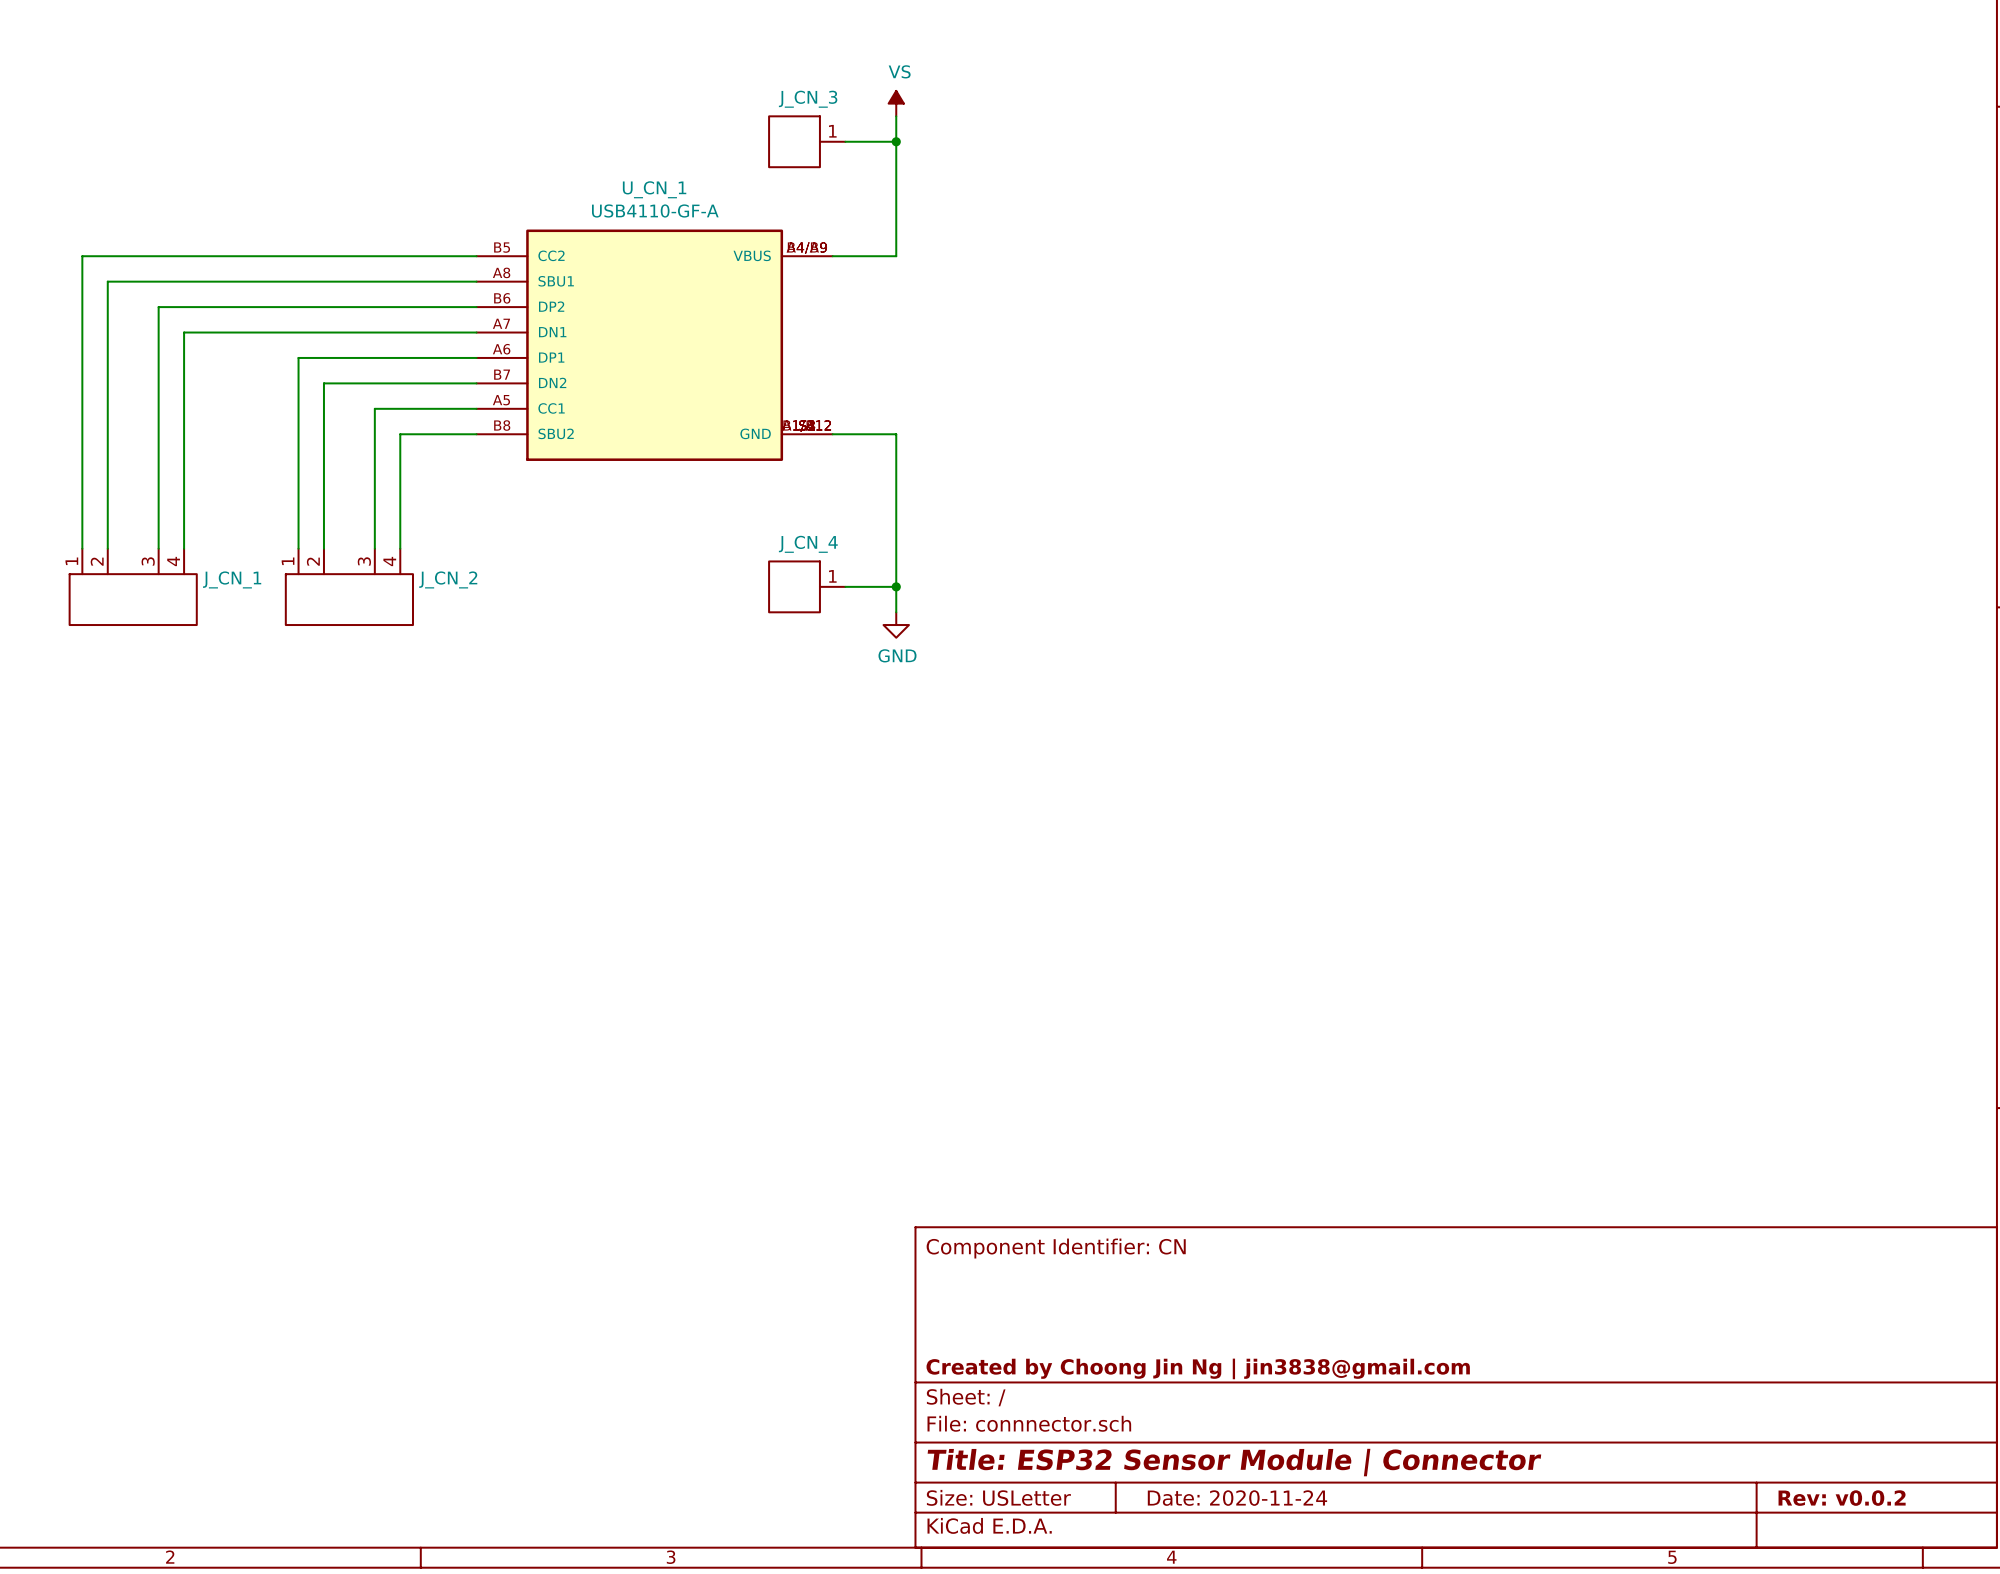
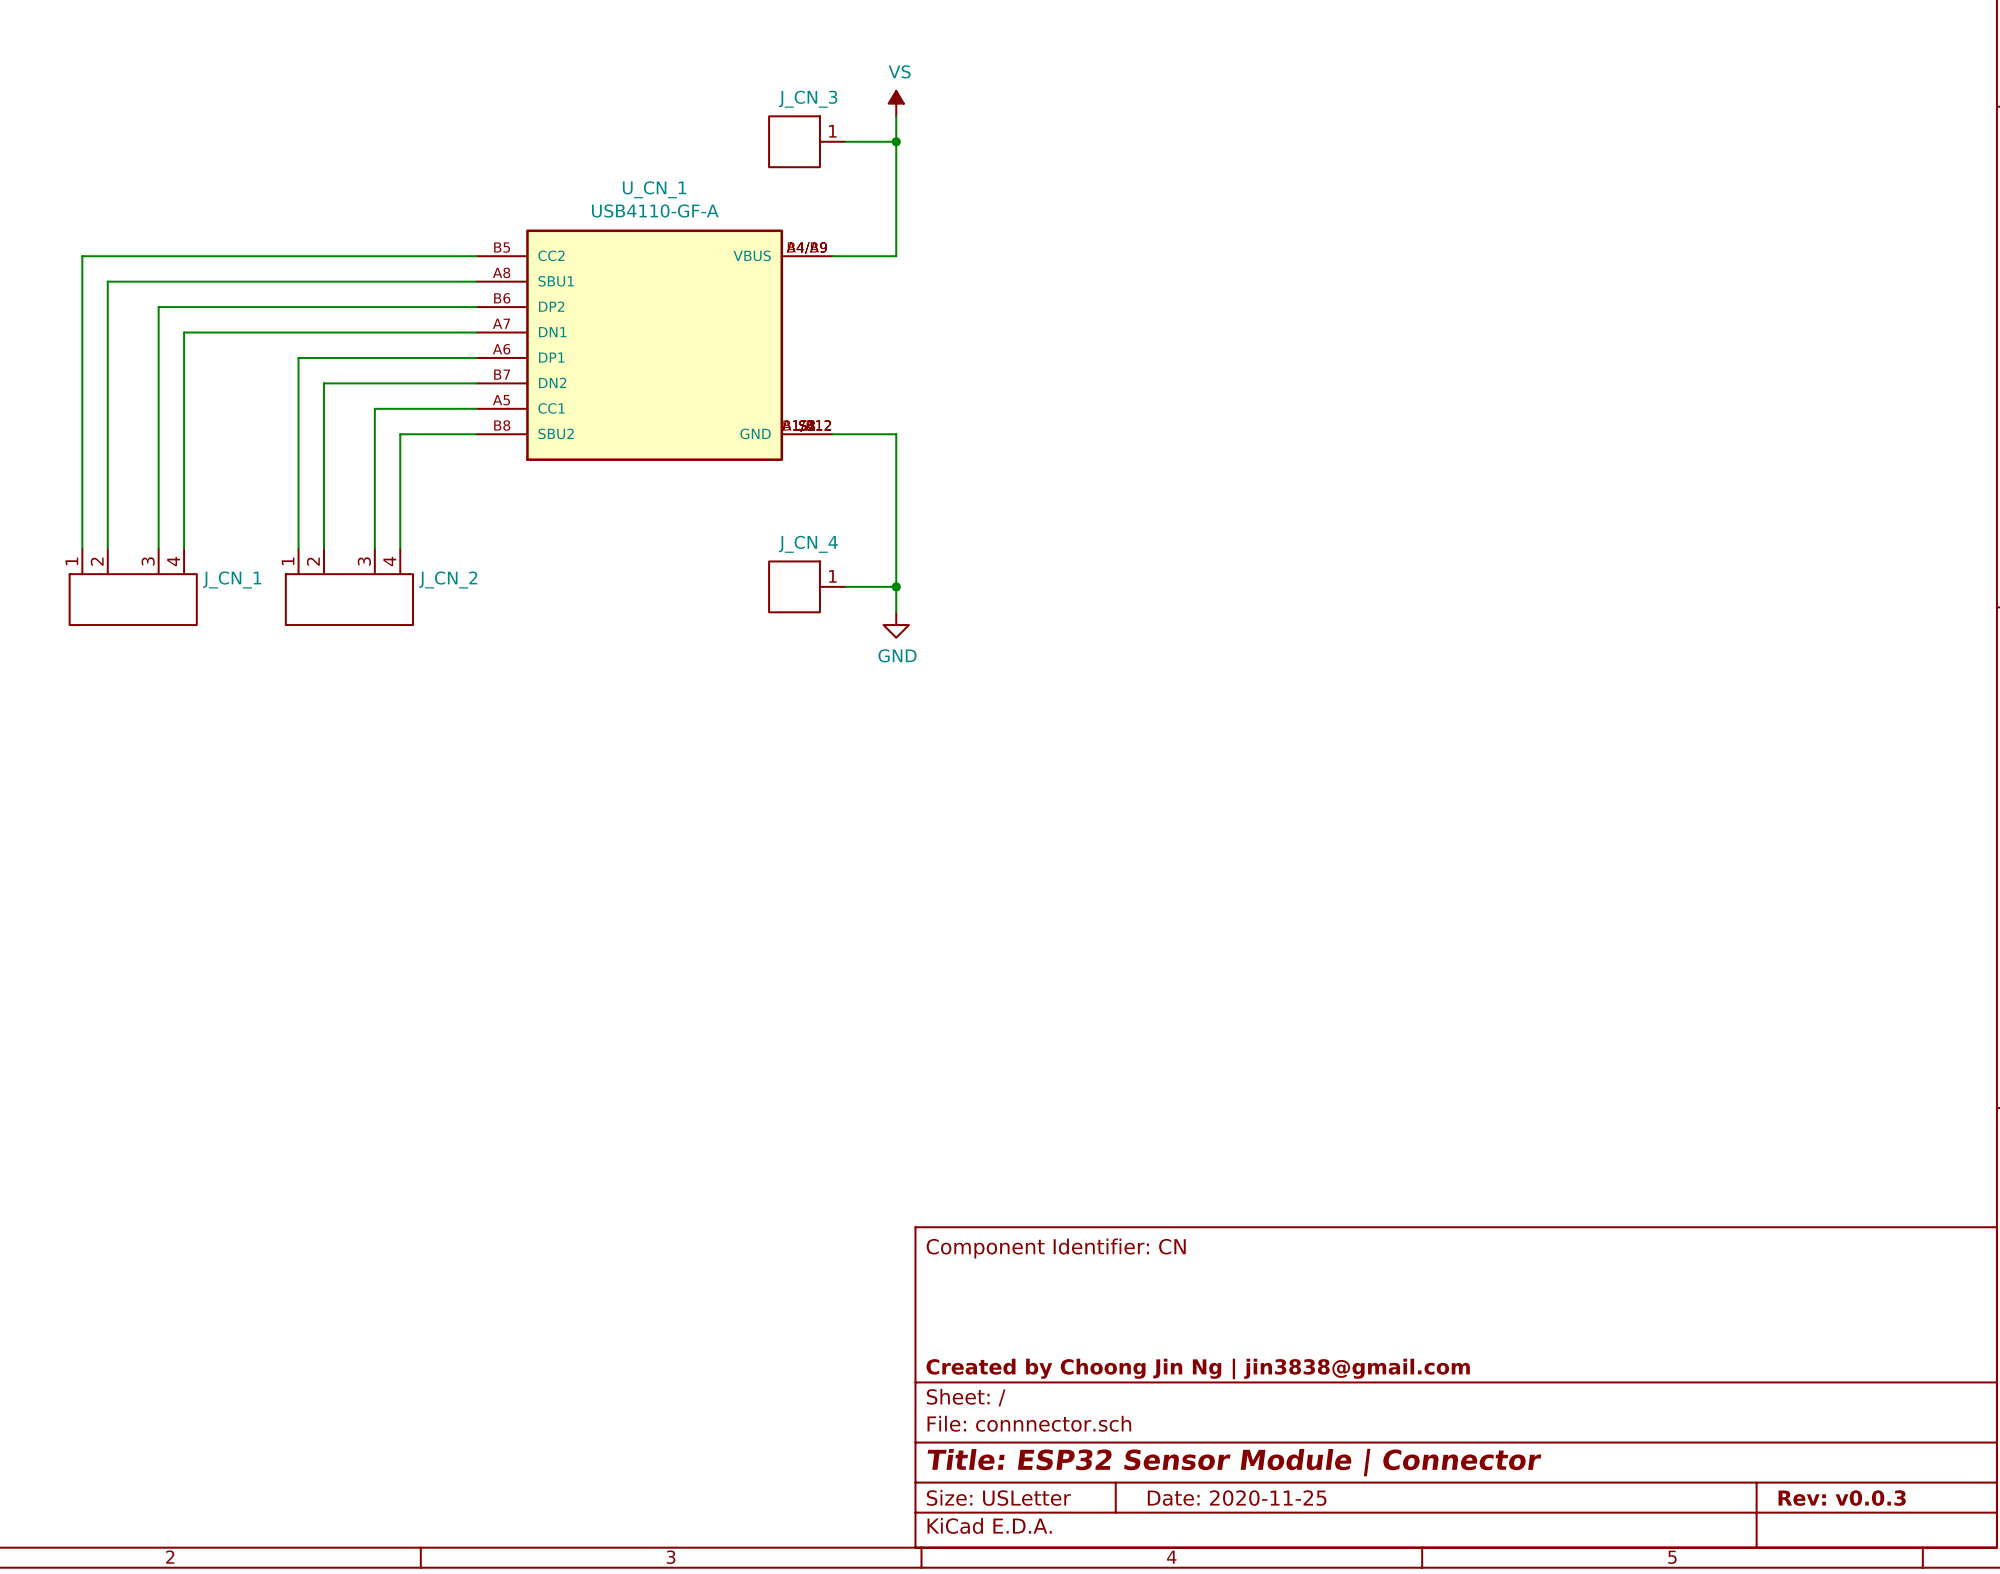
title block: Date: 2020-11-24 (1237, 1498) -> Date: 2020-11-25 (1237, 1498)
title block: Rev: v0.0.2 (1842, 1498) -> Rev: v0.0.3 (1842, 1498)

